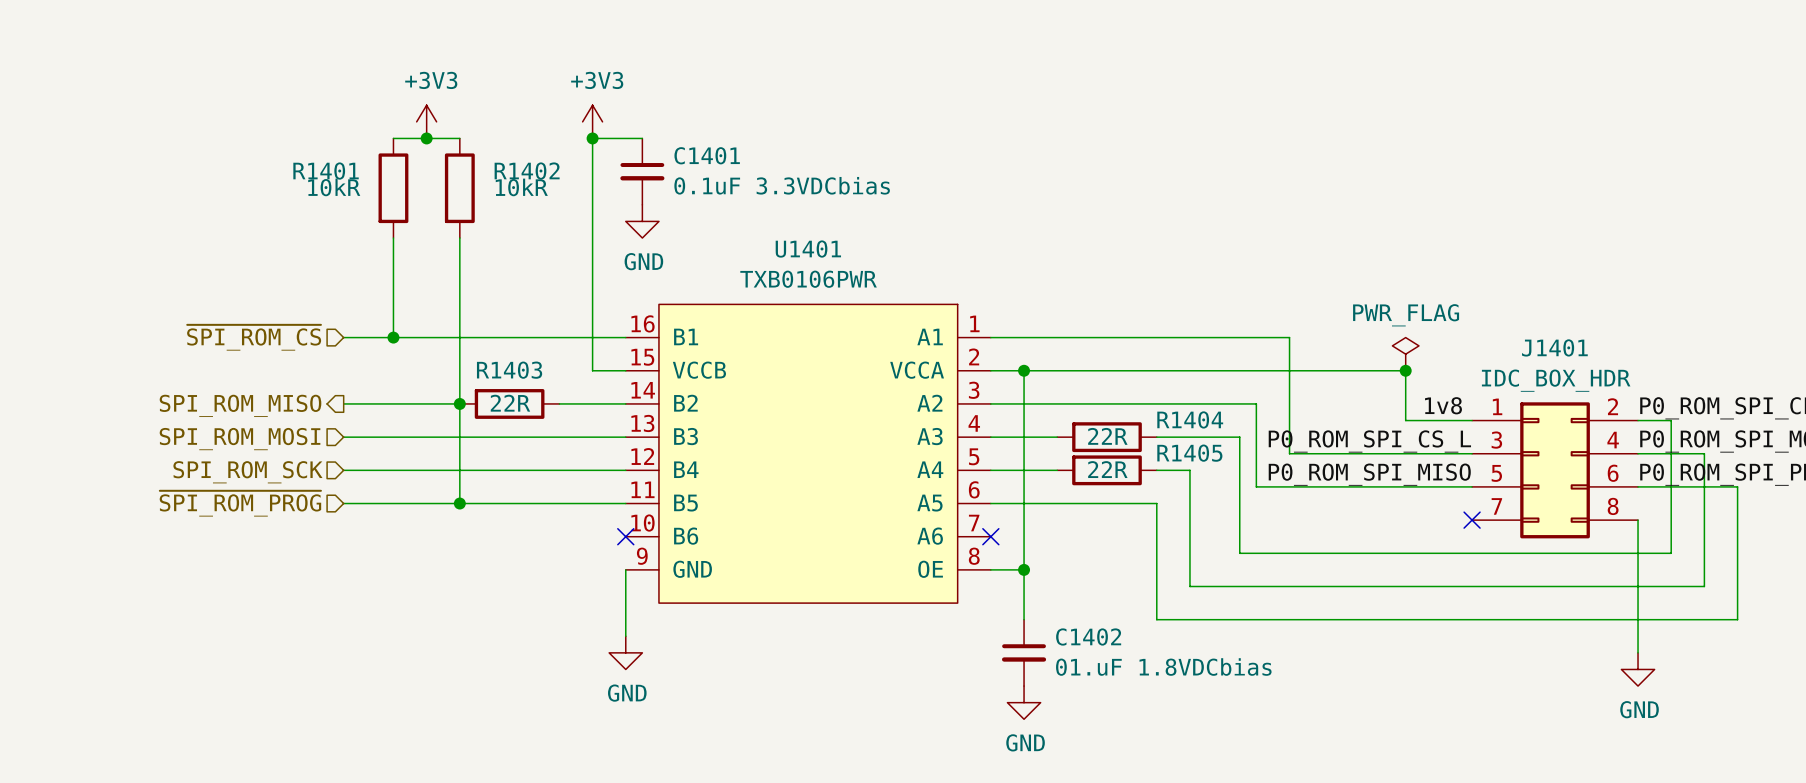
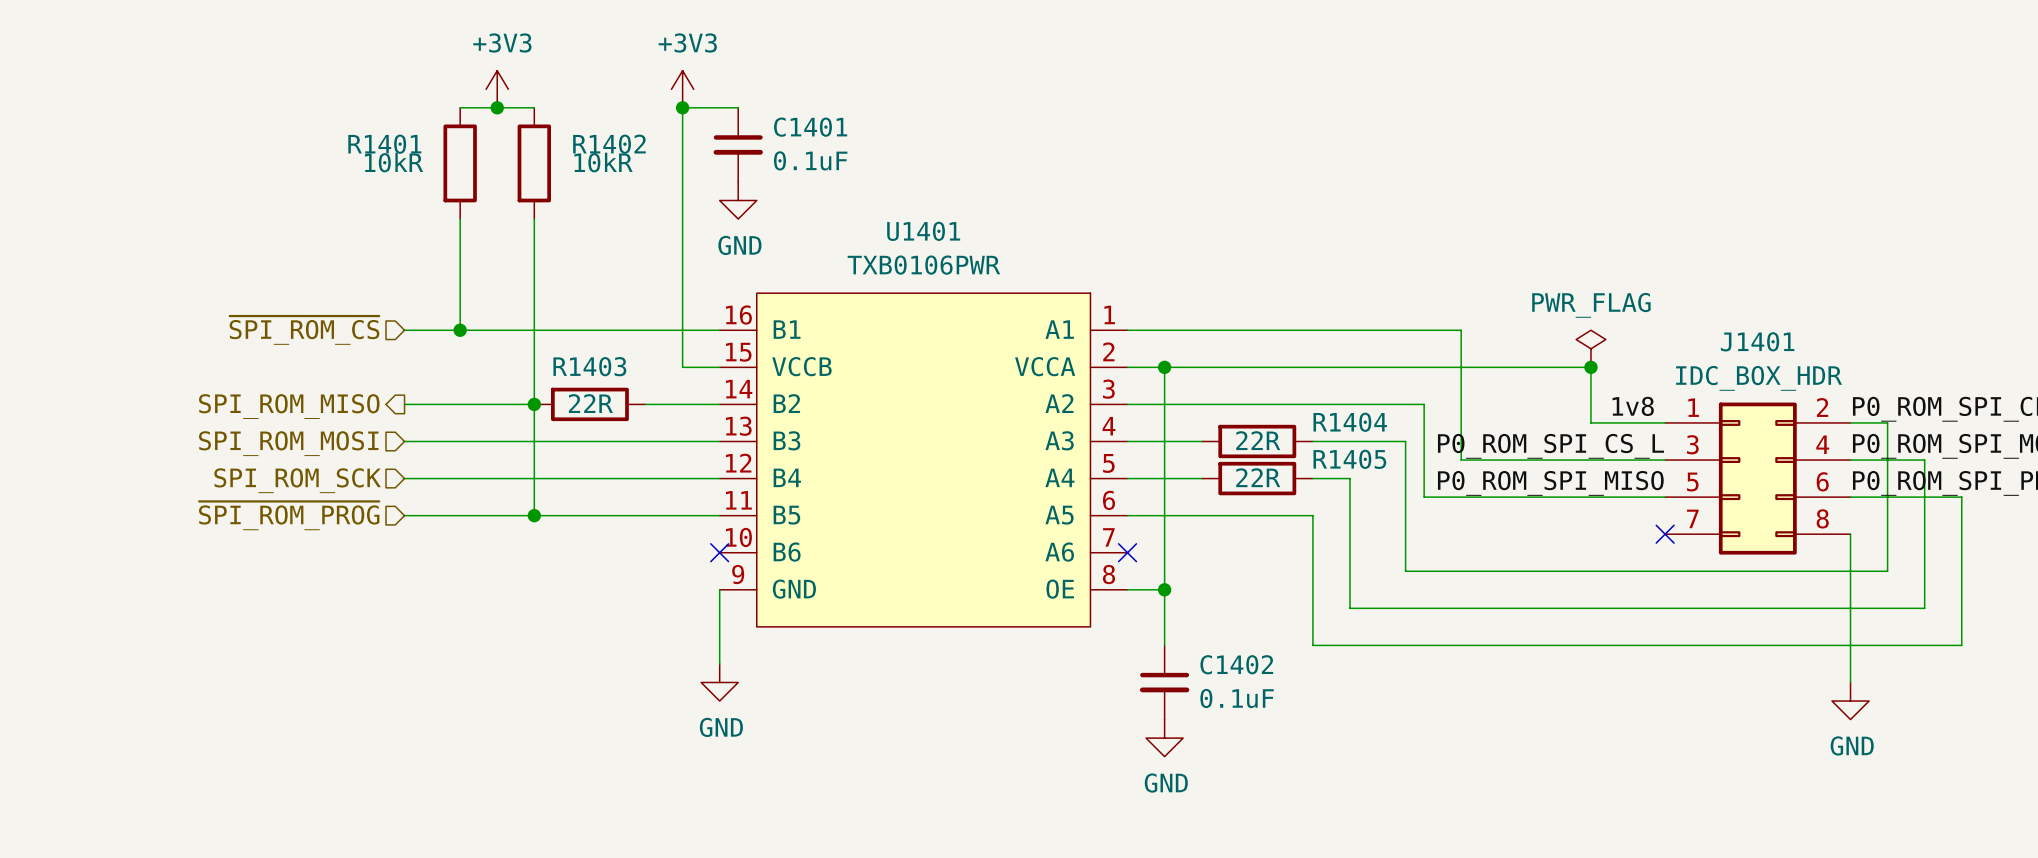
C1401 value: 0.1uF 3.3VDCbias (782, 185) -> 0.1uF (810, 160)
C1402 value: 01.uF 1.8VDCbias (1163, 667) -> 0.1uF (1237, 698)

